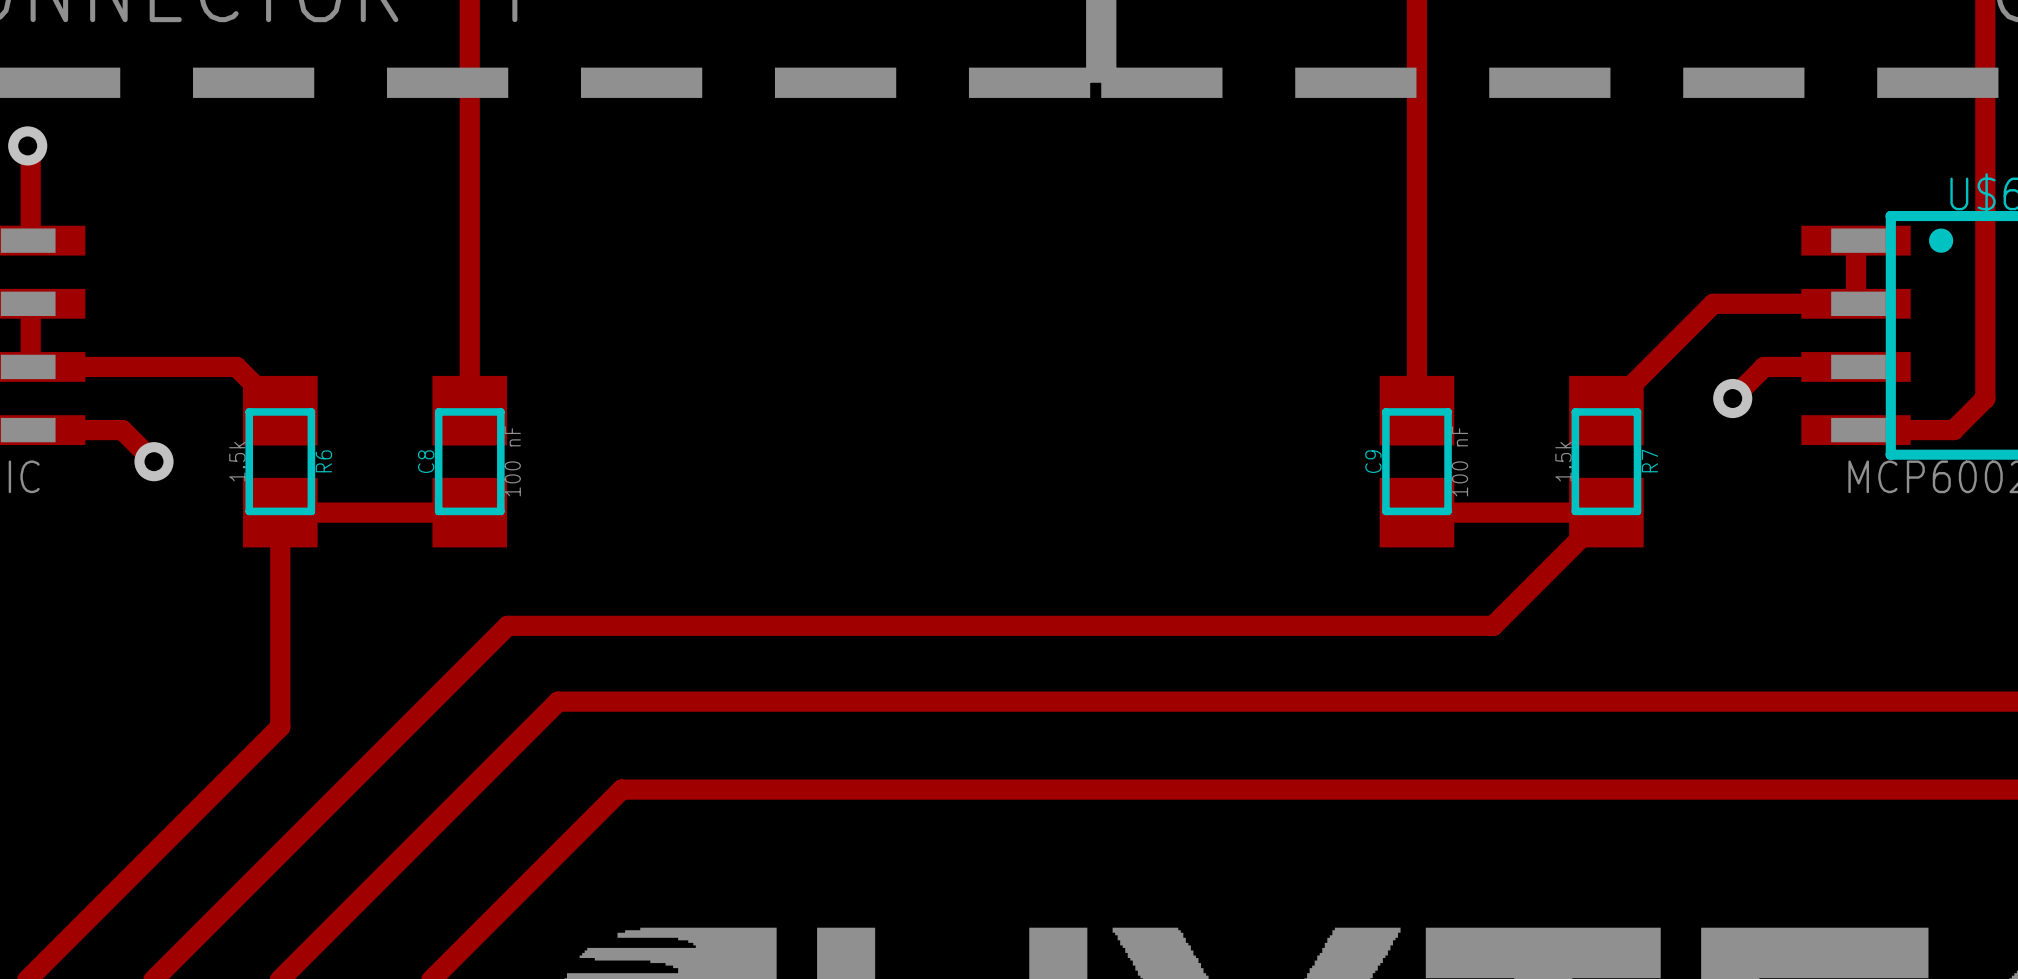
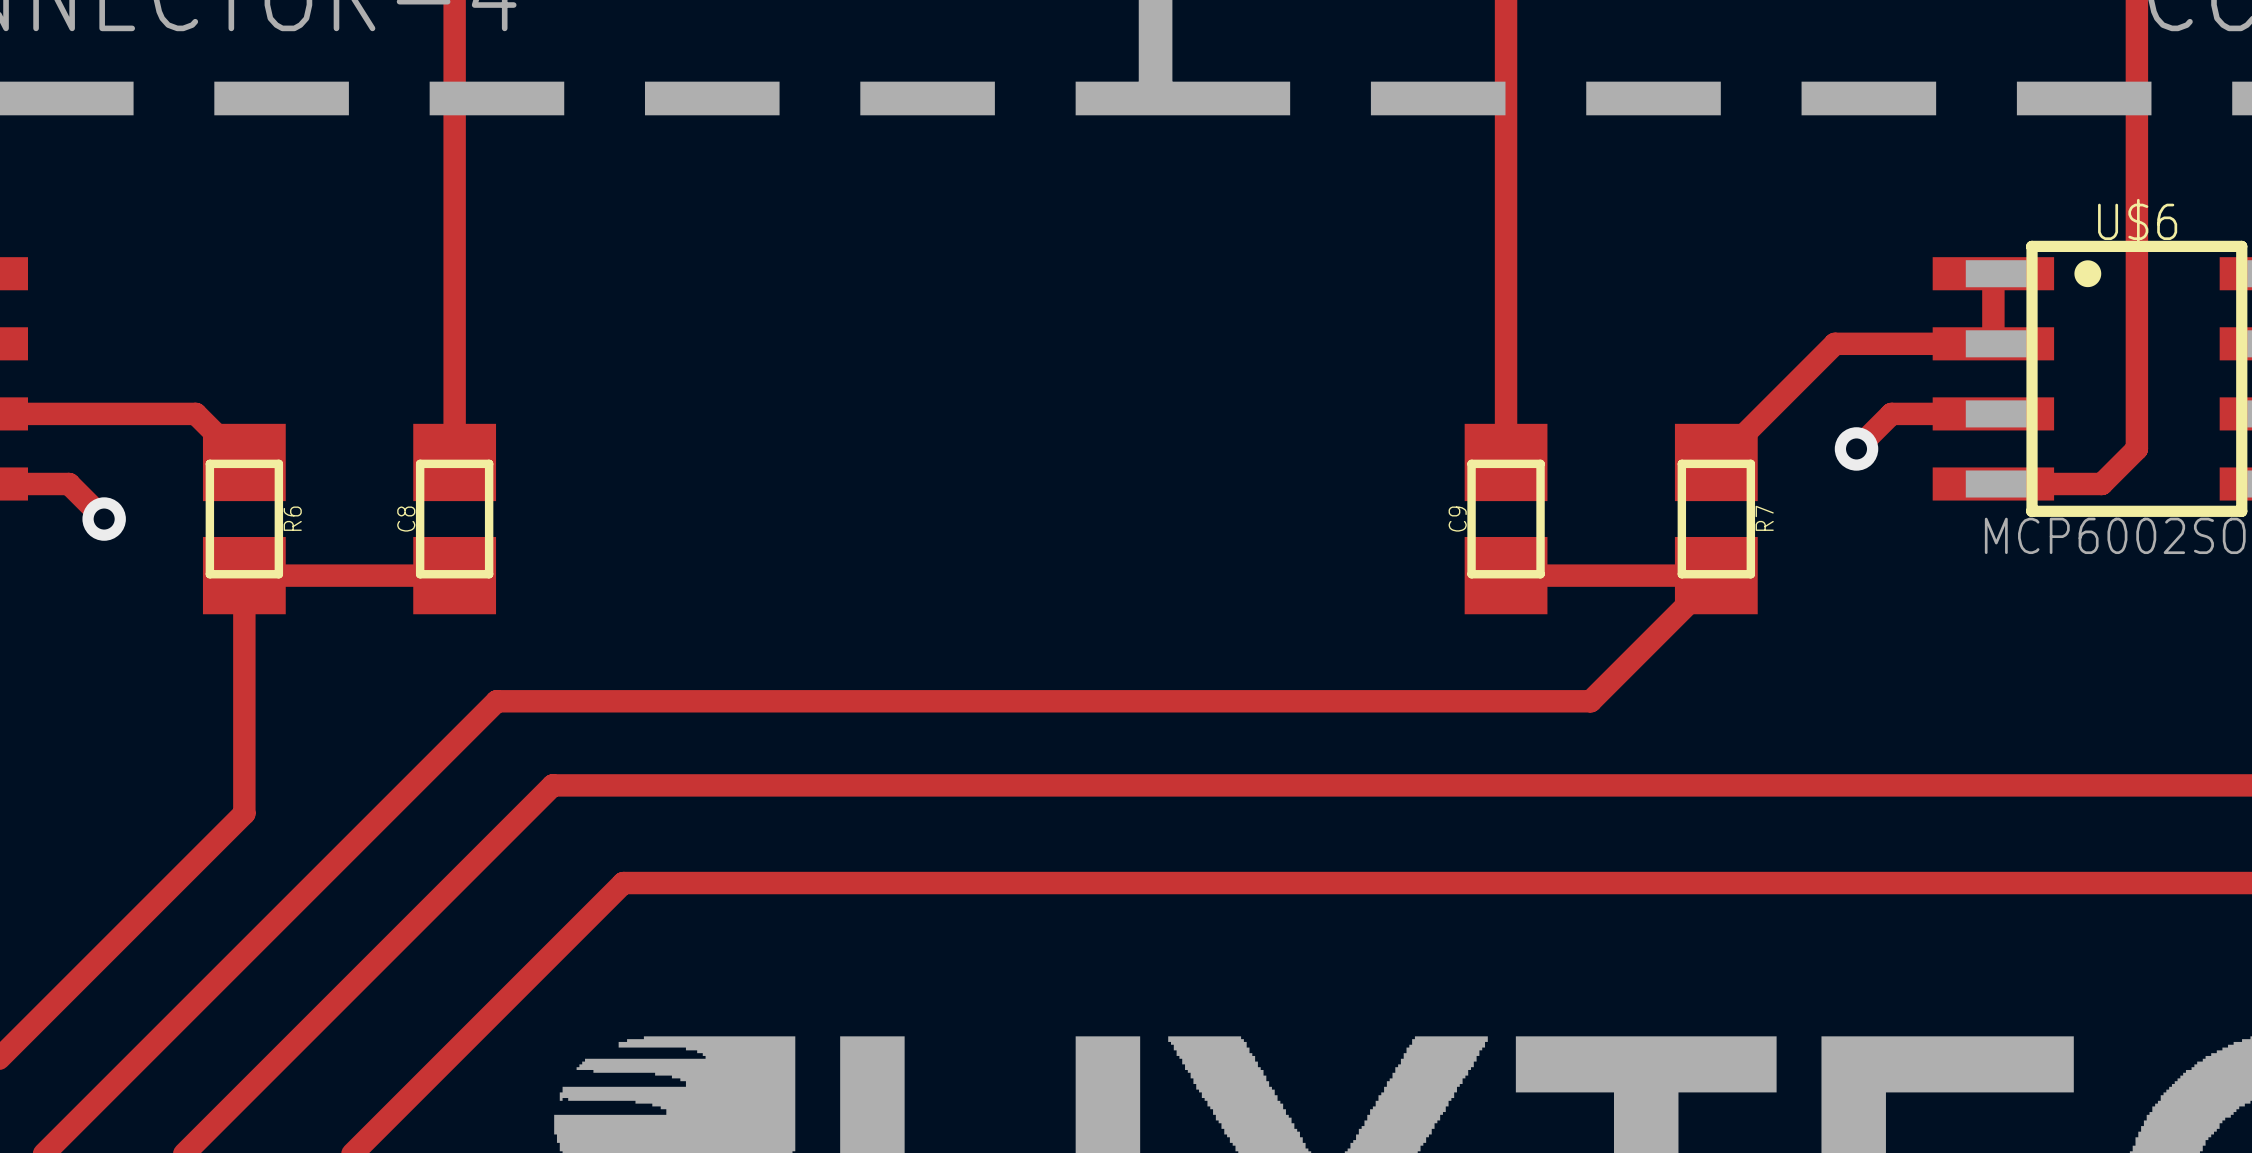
R6 value: 1.5k (237, 461) -> none
C8 value: 100 nF (512, 461) -> none
C9 value: 100 nF (1459, 461) -> none
R7 value: 1.5k (1563, 461) -> none

